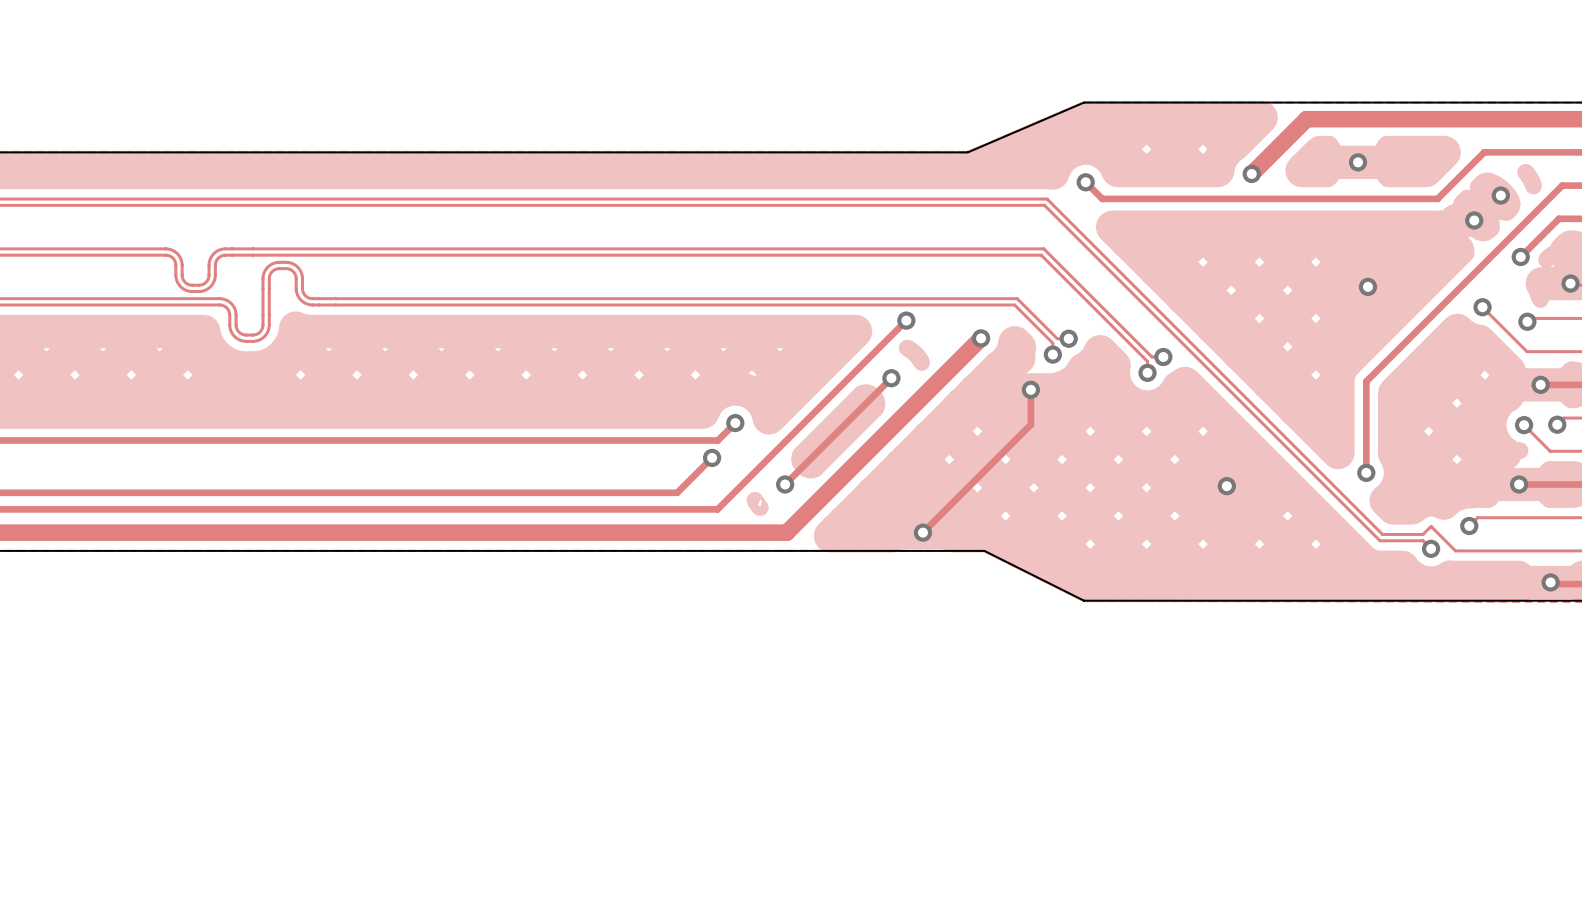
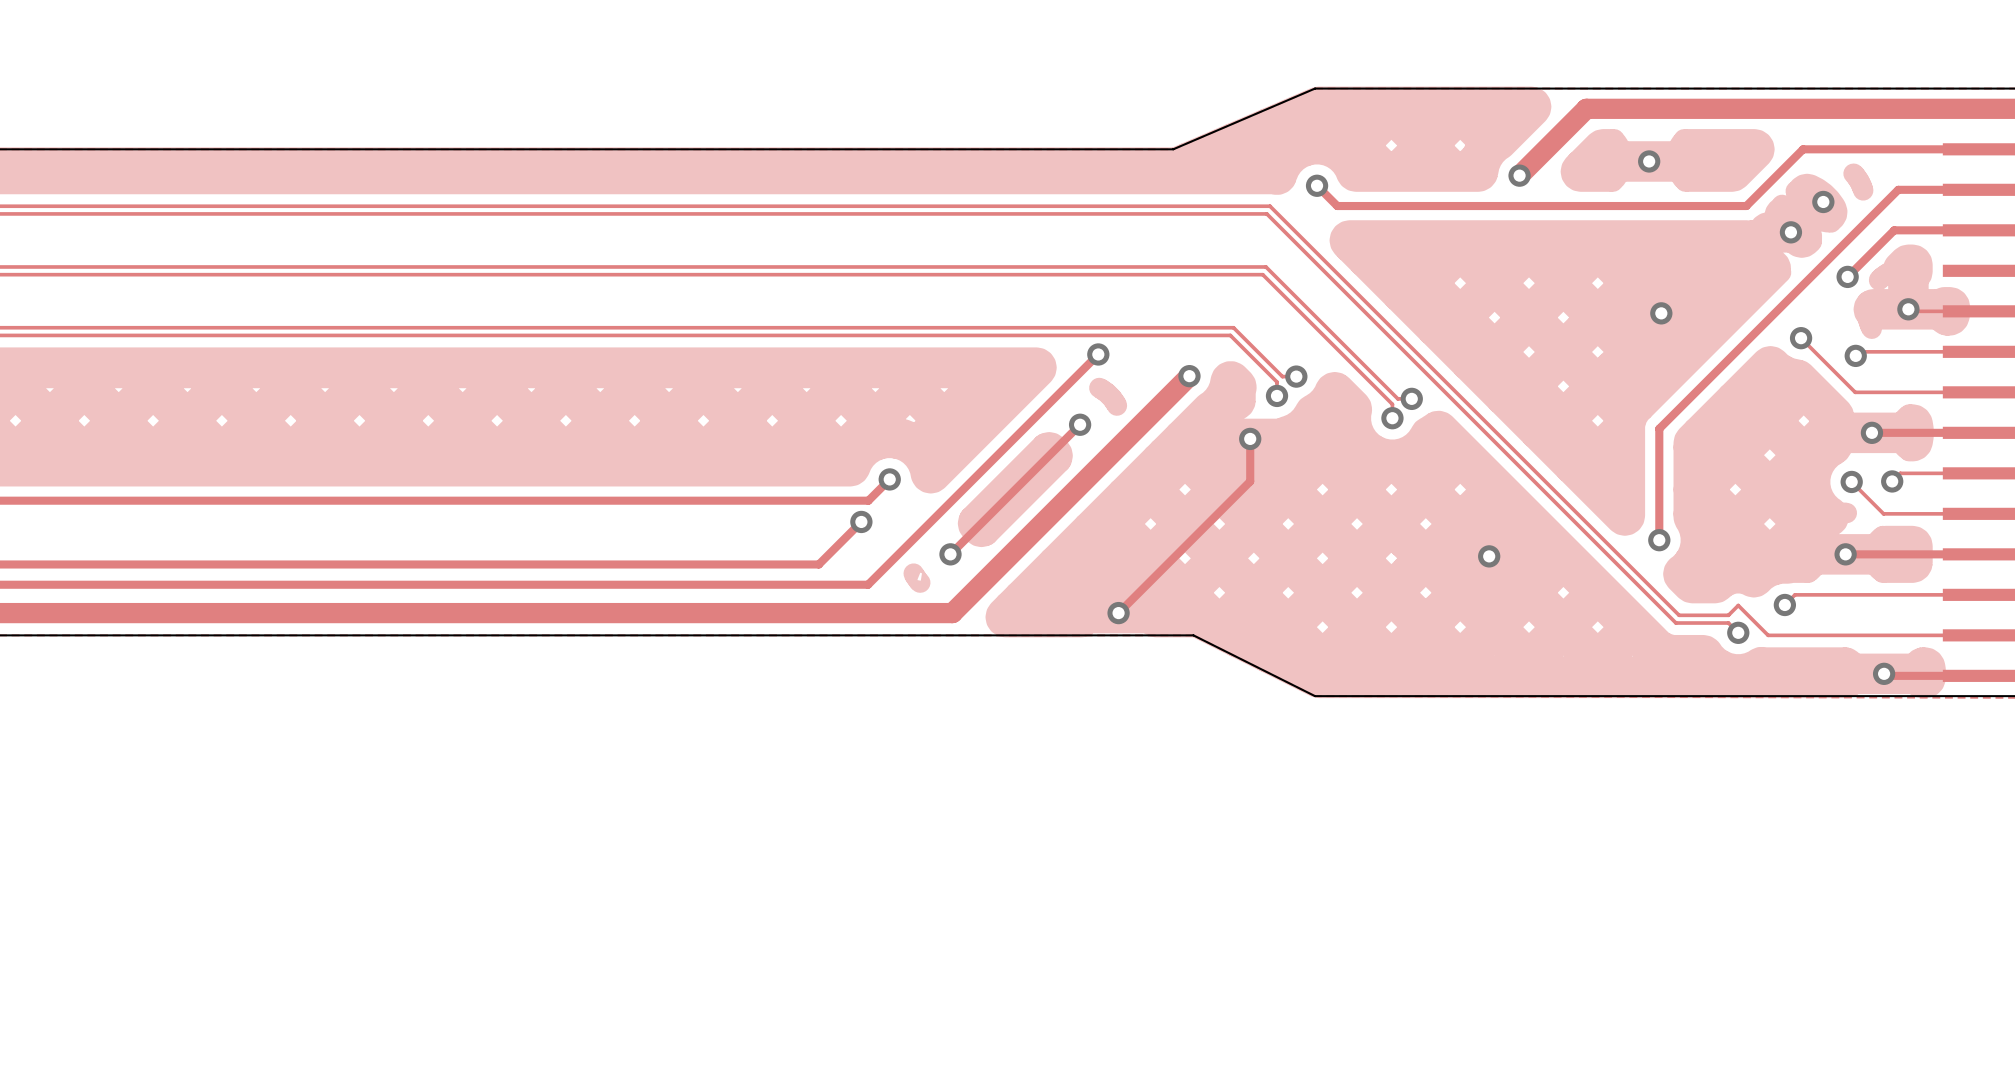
track: (165, 248) (172, 250) (178, 255) (181, 261) (183, 279) (186, 283) (192, 285) (201, 284) (206, 282) (208, 277) (211, 256) (218, 250) (225, 248) -> (195, 266) (267, 266)
track: (165, 255) (171, 256) (174, 260) (176, 278) (179, 285) (185, 289) (192, 291) (202, 291) (210, 286) (214, 278) (216, 260) (220, 256) (225, 255) -> (195, 274) (267, 274)
track: (219, 298) (226, 300) (232, 304) (235, 311) (237, 329) (240, 333) (246, 335) (257, 334) (262, 328) (263, 276) (265, 270) (272, 263) (287, 262) (296, 265) (302, 275) (303, 292) (307, 297) (312, 298) -> (260, 327) (374, 327)
track: (219, 304) (225, 306) (228, 310) (230, 328) (233, 335) (239, 339) (246, 341) (259, 339) (268, 330) (269, 277) (275, 269) (287, 268) (293, 271) (295, 276) (298, 297) (303, 302) (312, 304) -> (260, 335) (374, 335)

